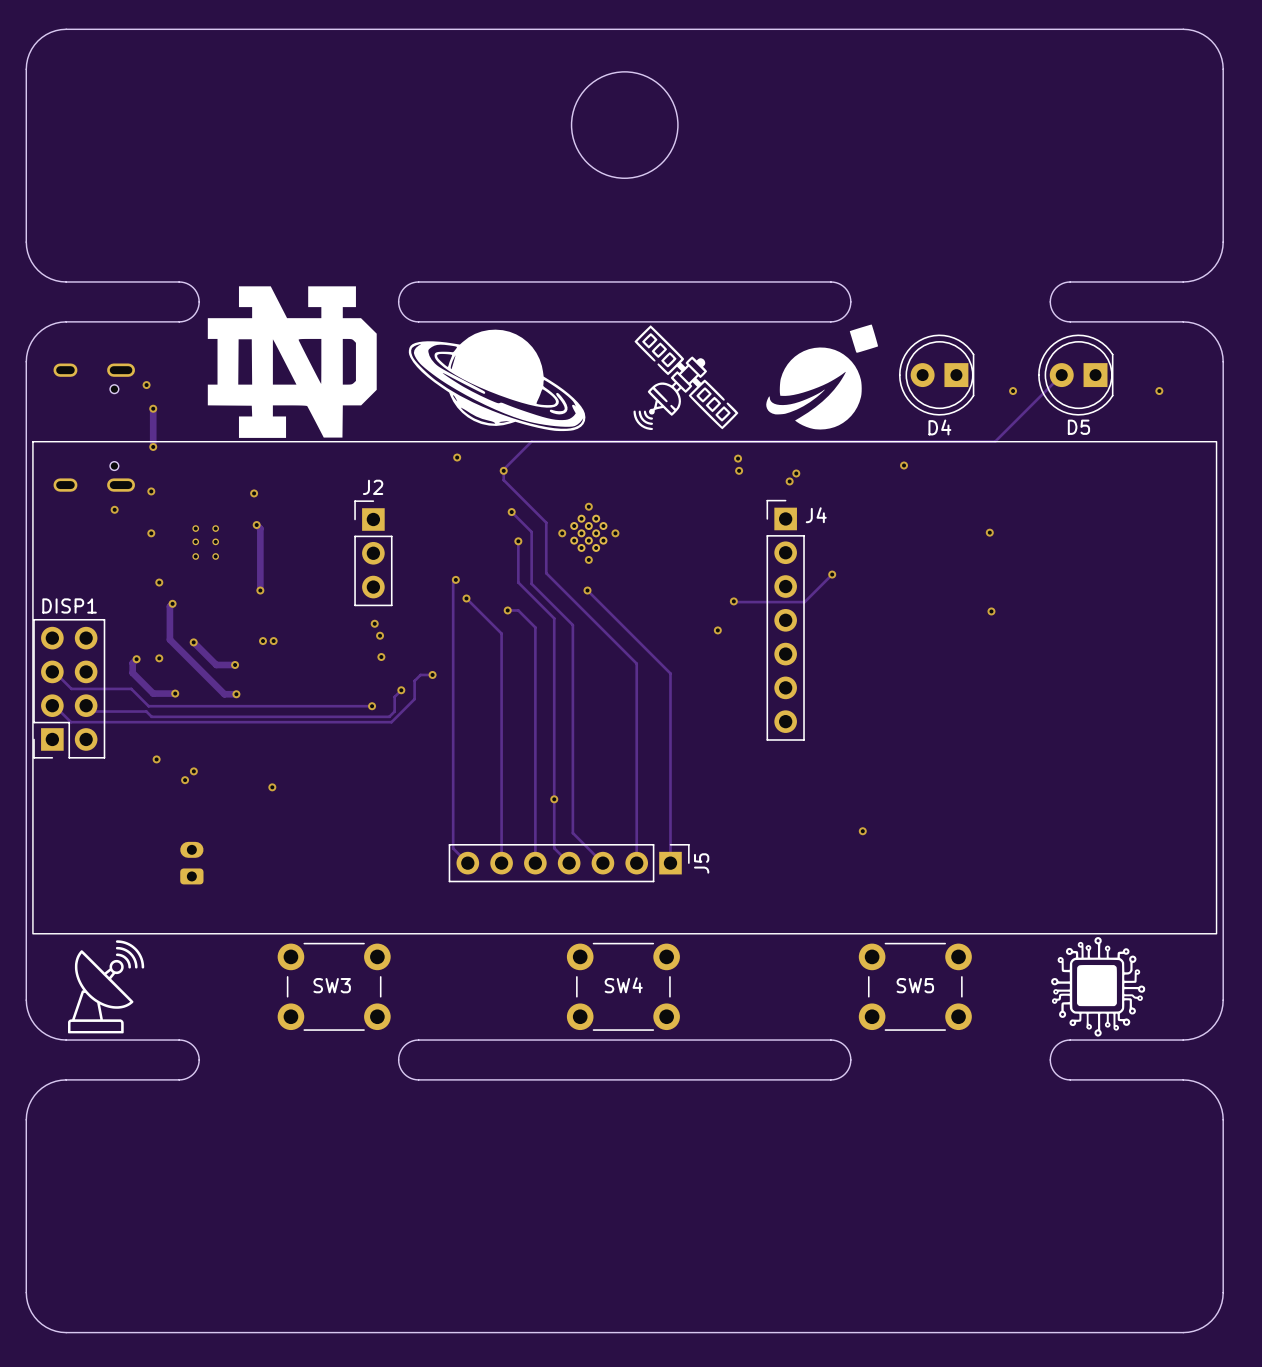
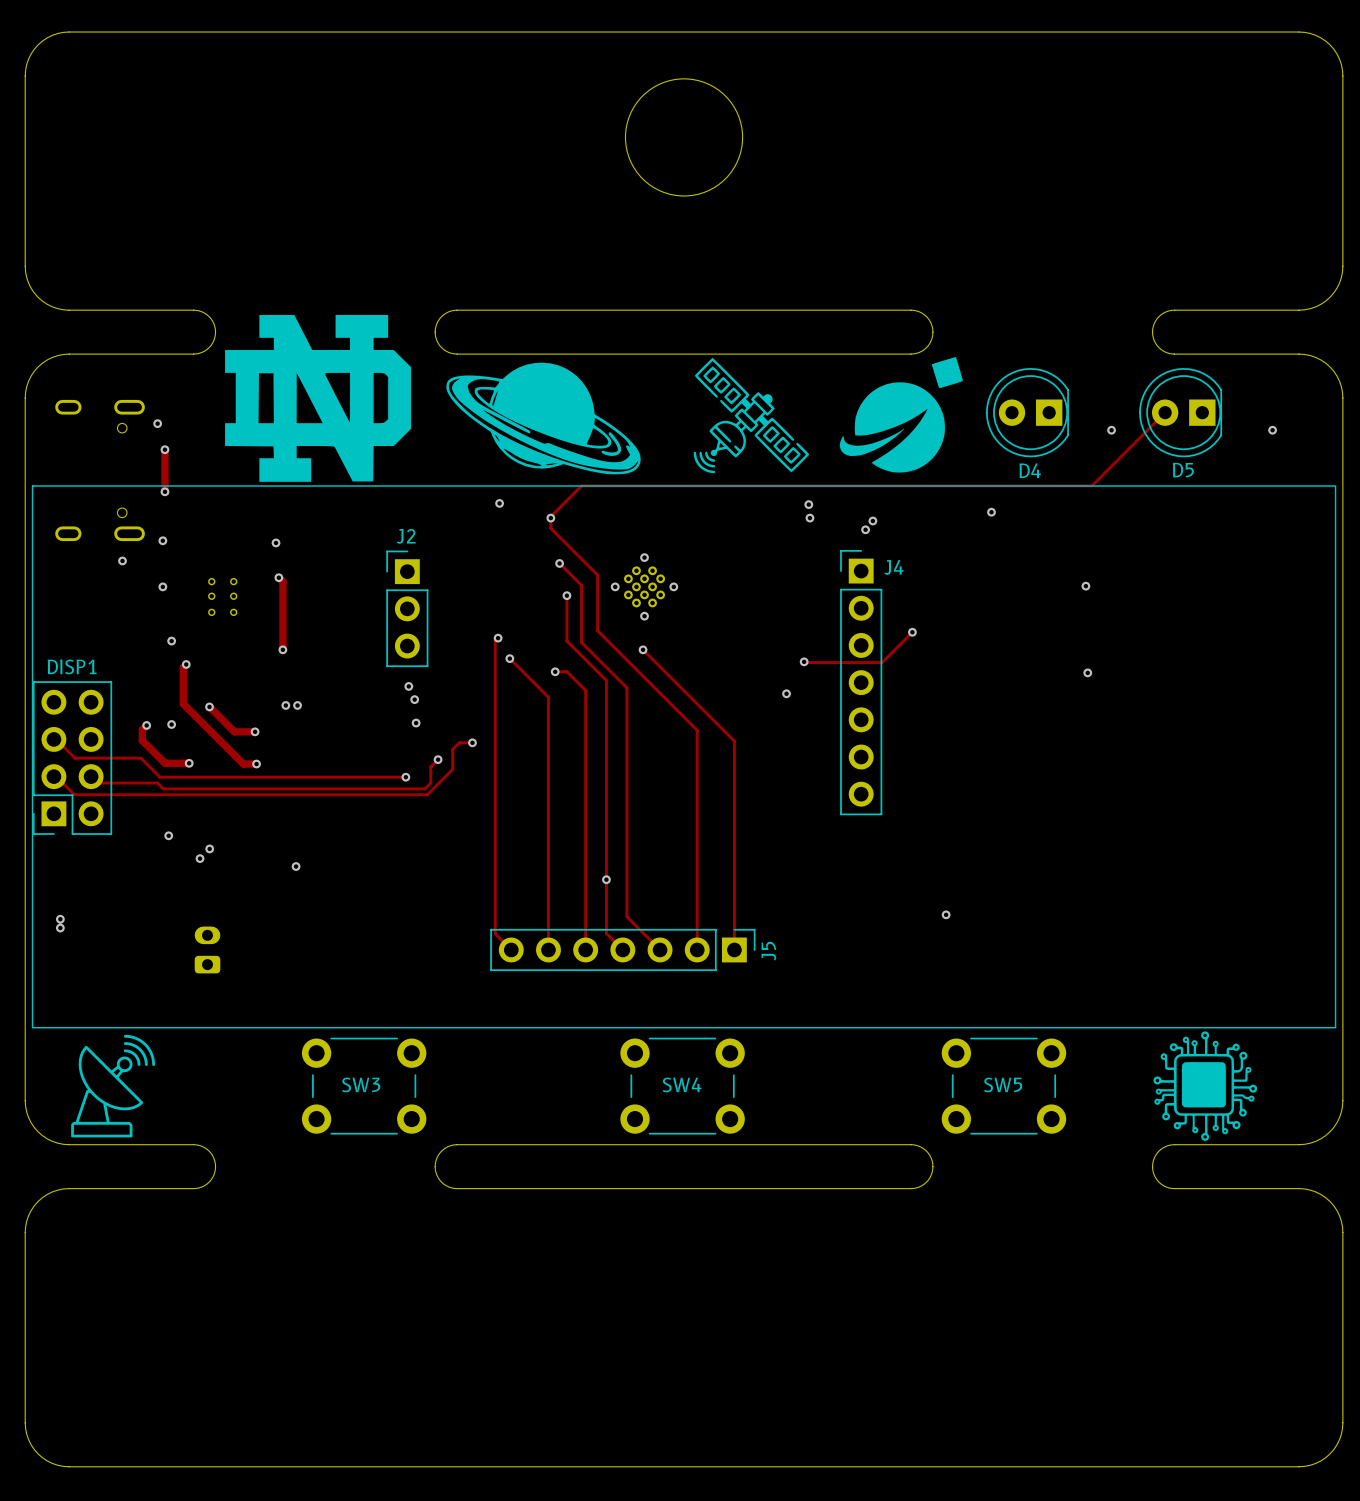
via: none -> (60, 919)
via: none -> (60, 928)

